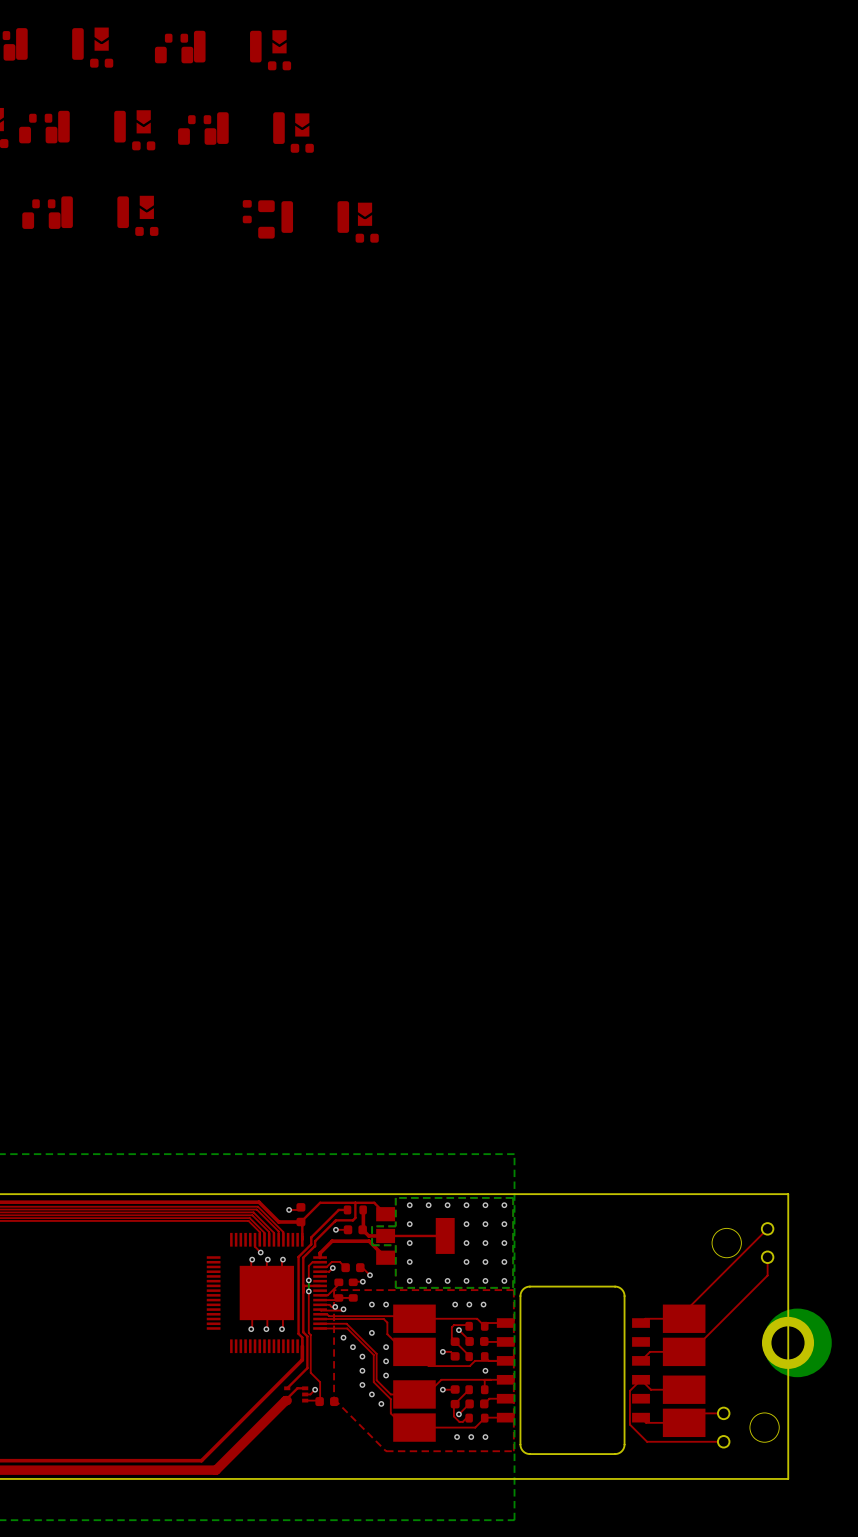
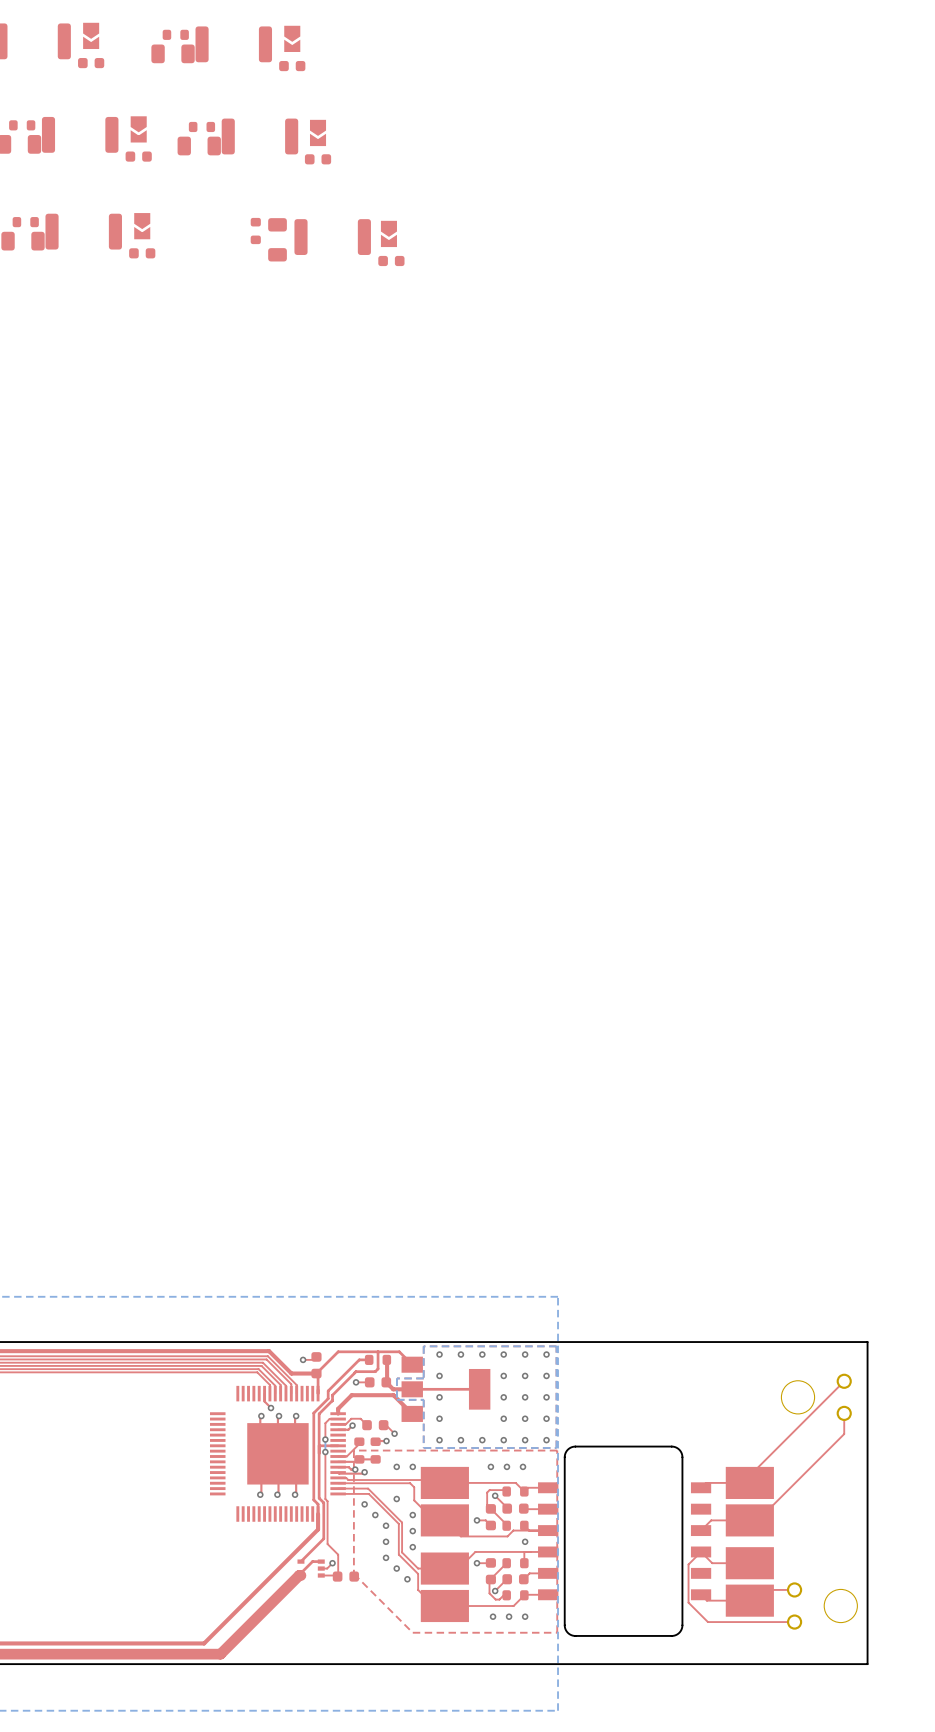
part: (796, 1342) -> none

